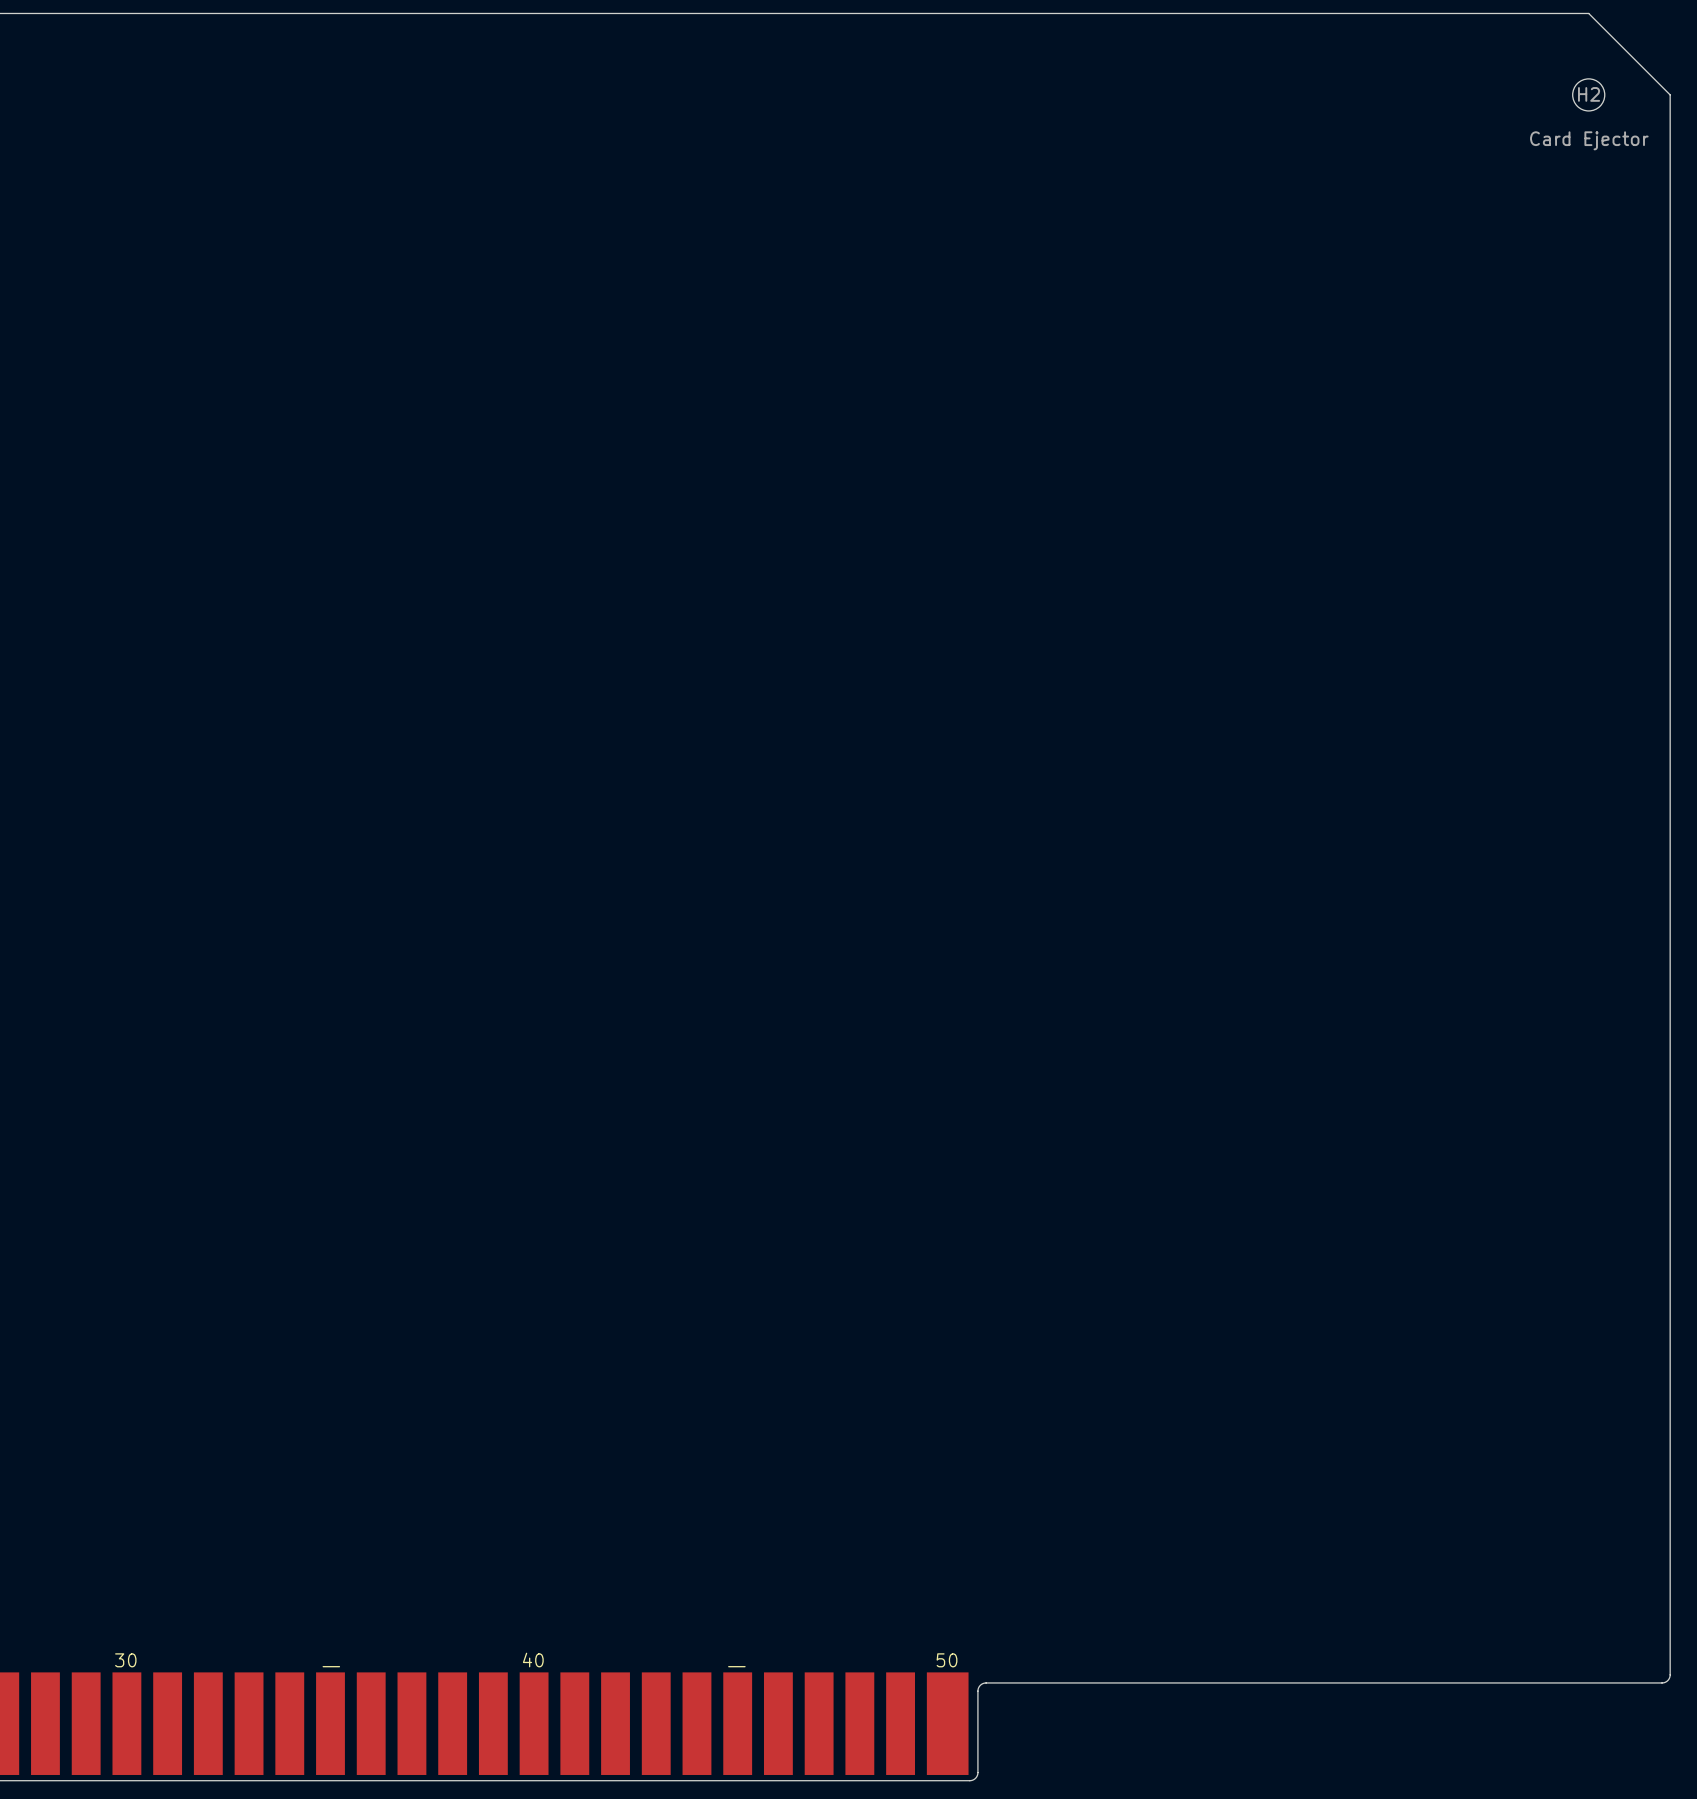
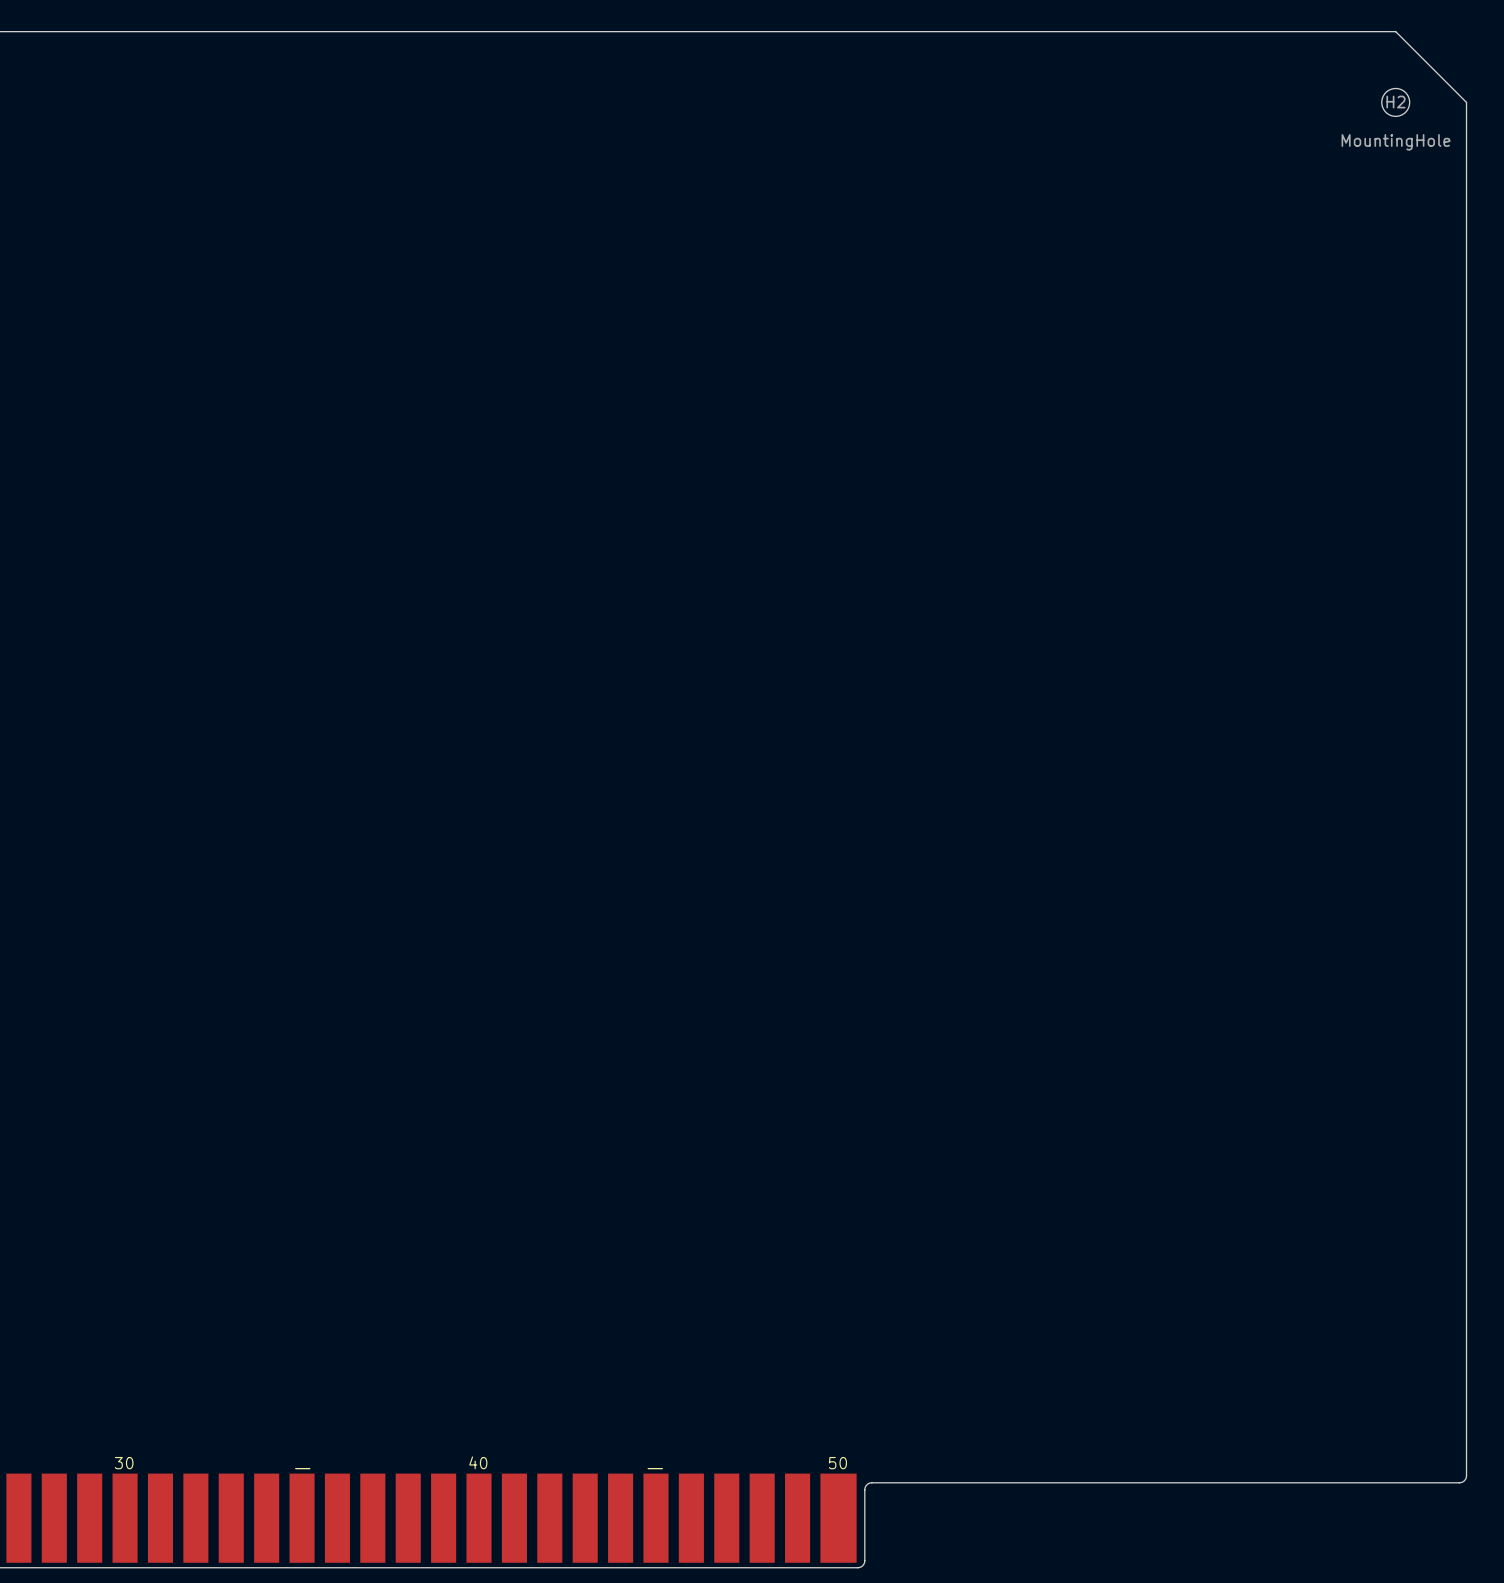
H2 value: Card Ejector (1589, 140) -> MountingHole (1395, 142)

